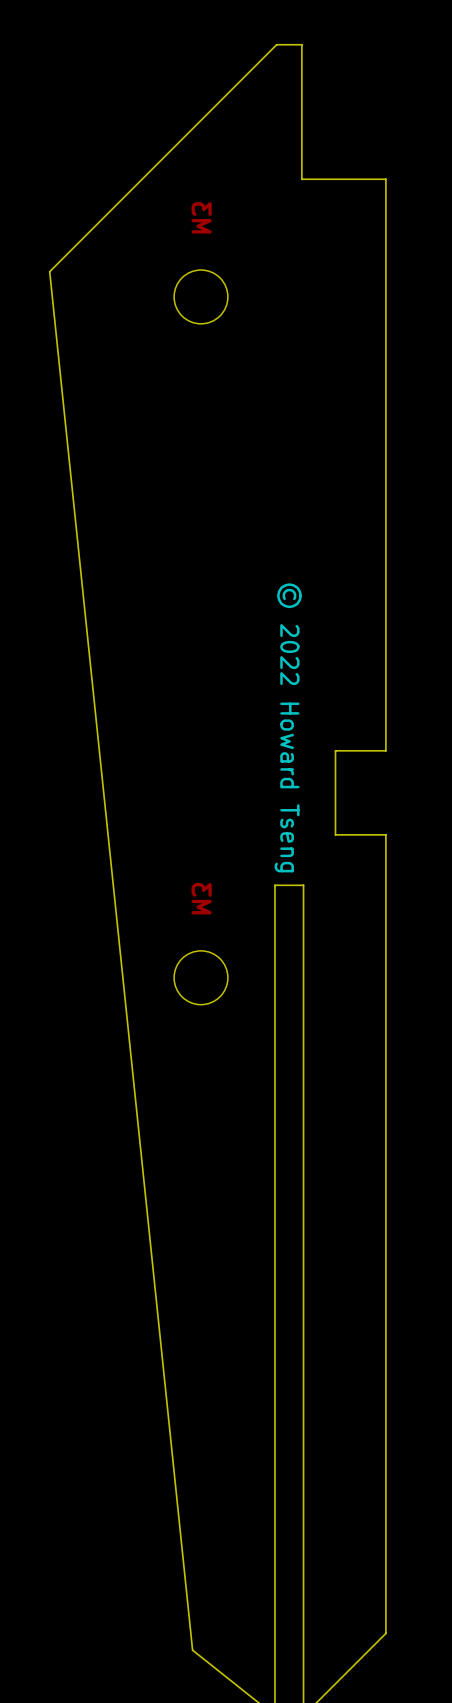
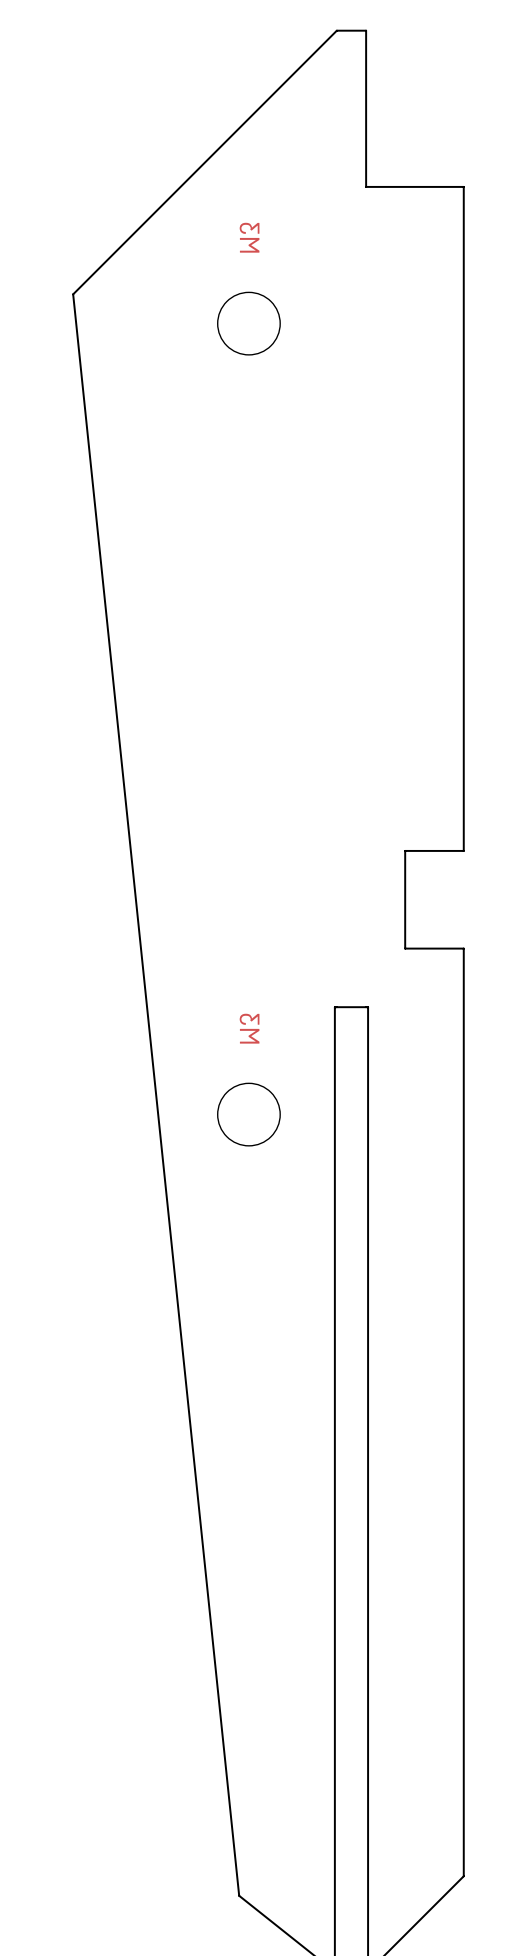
text: © 2022 Howard Tseng (288, 727) -> none

